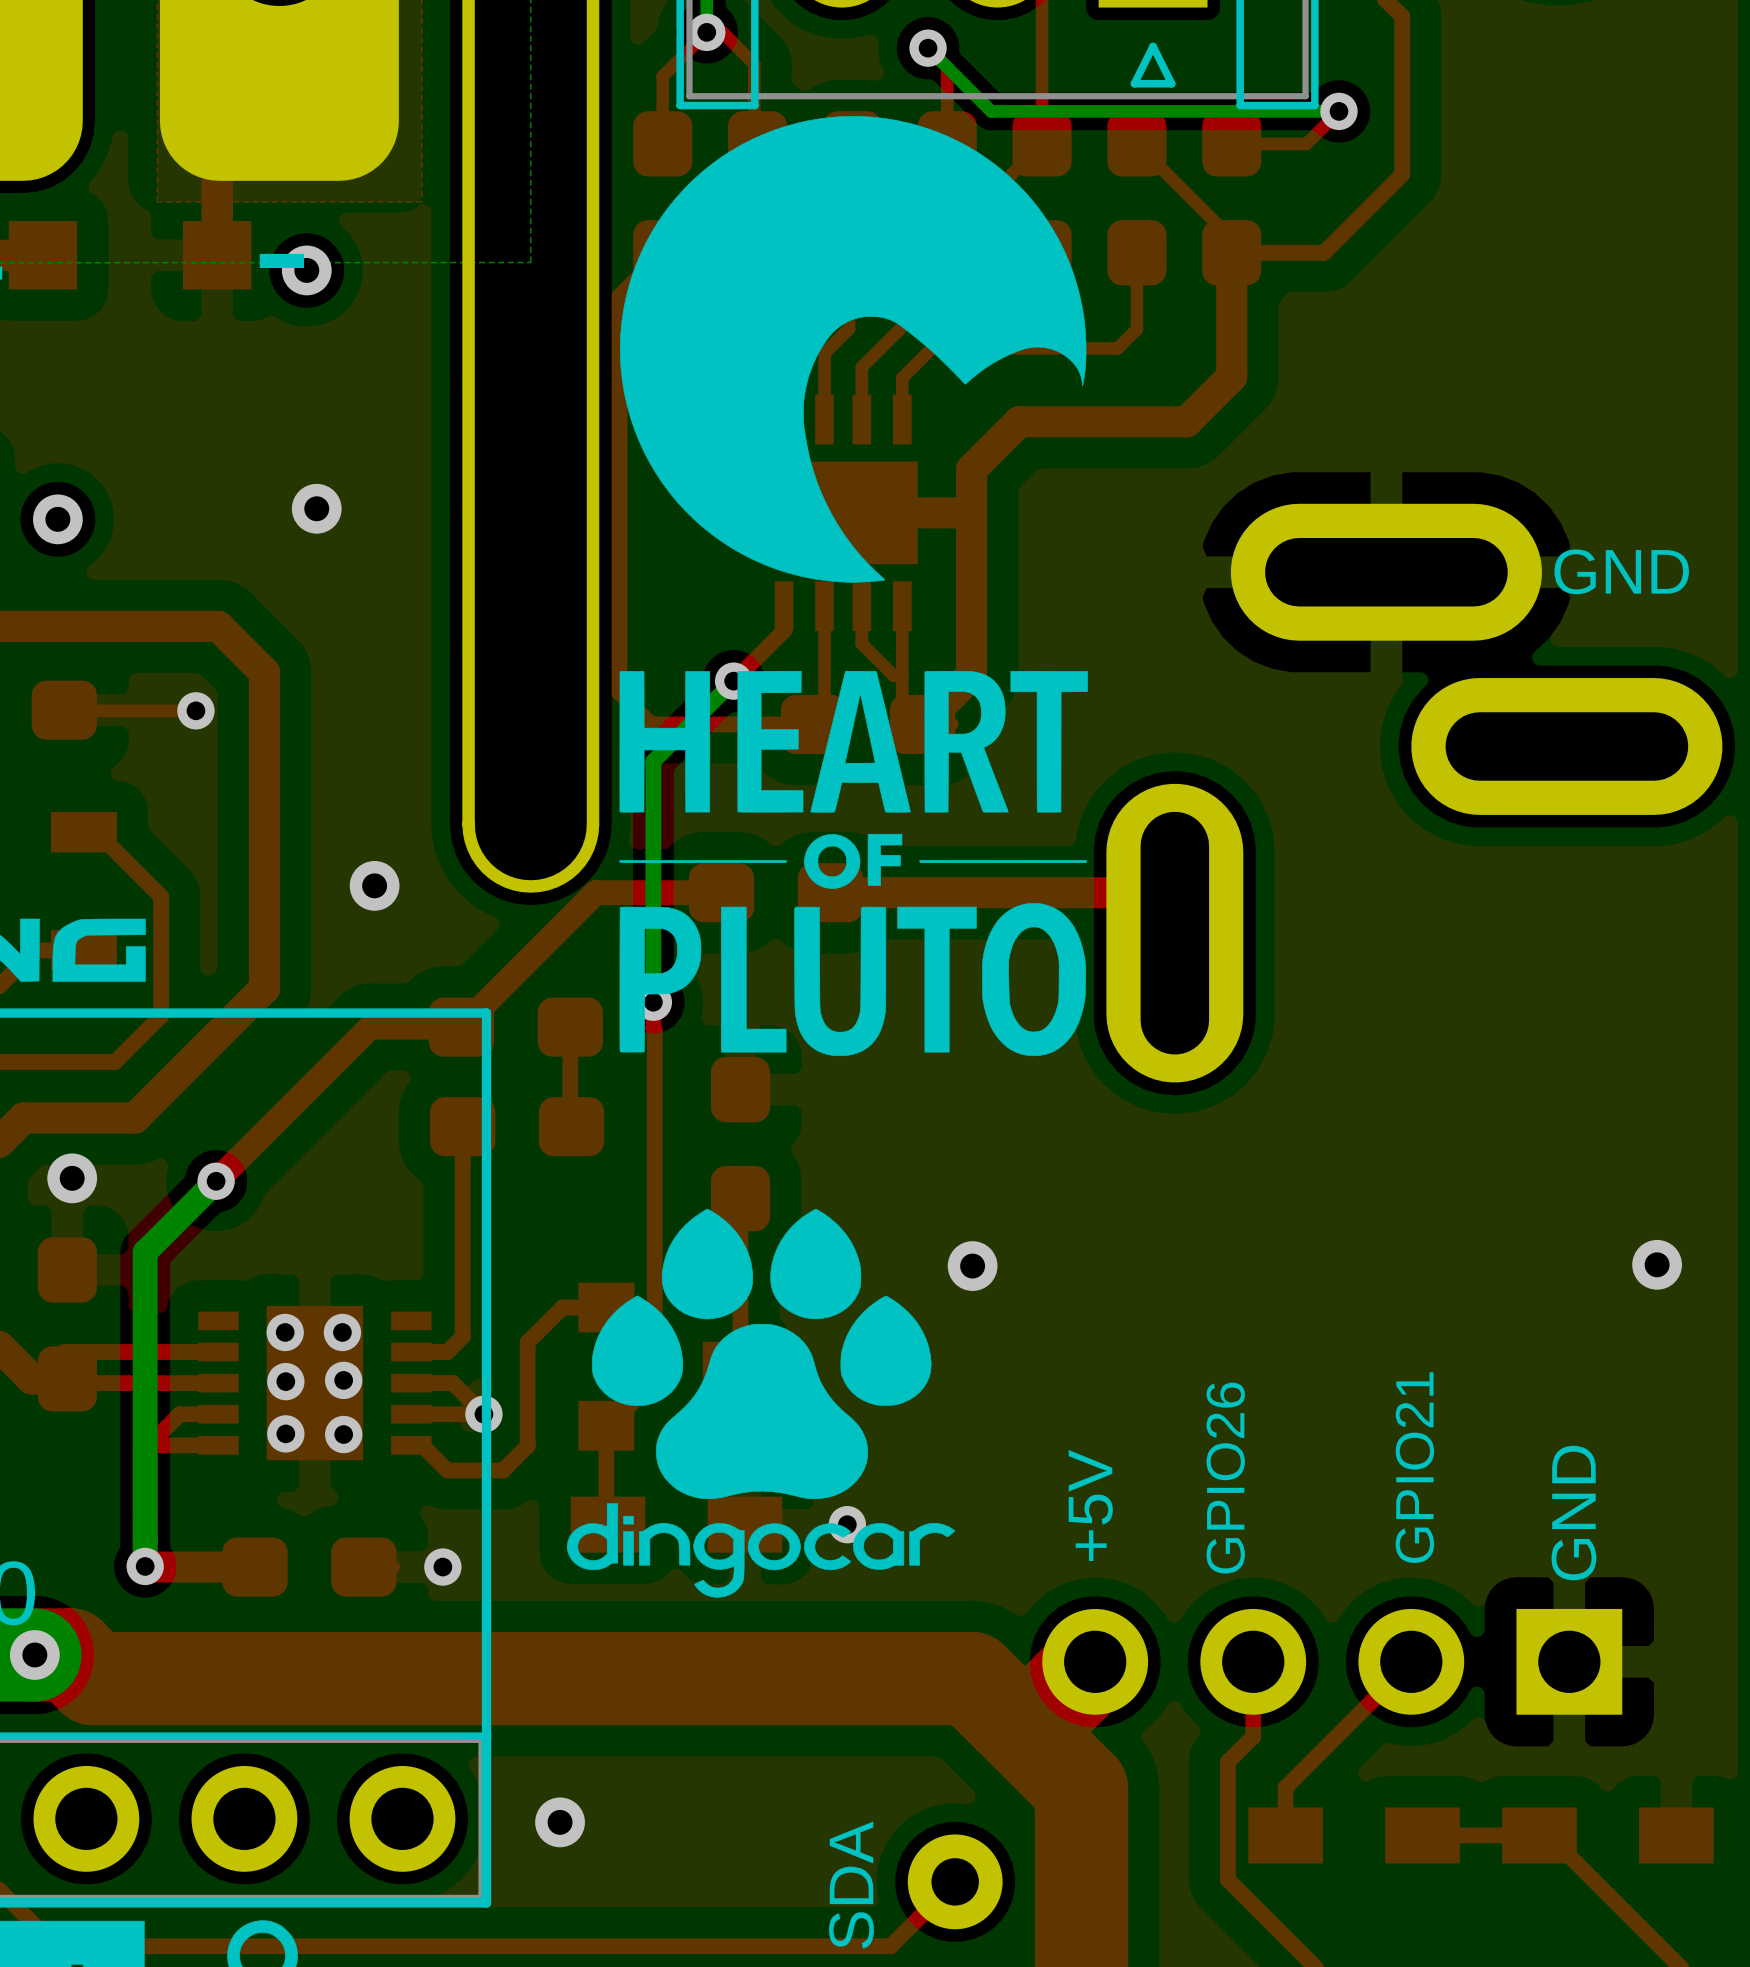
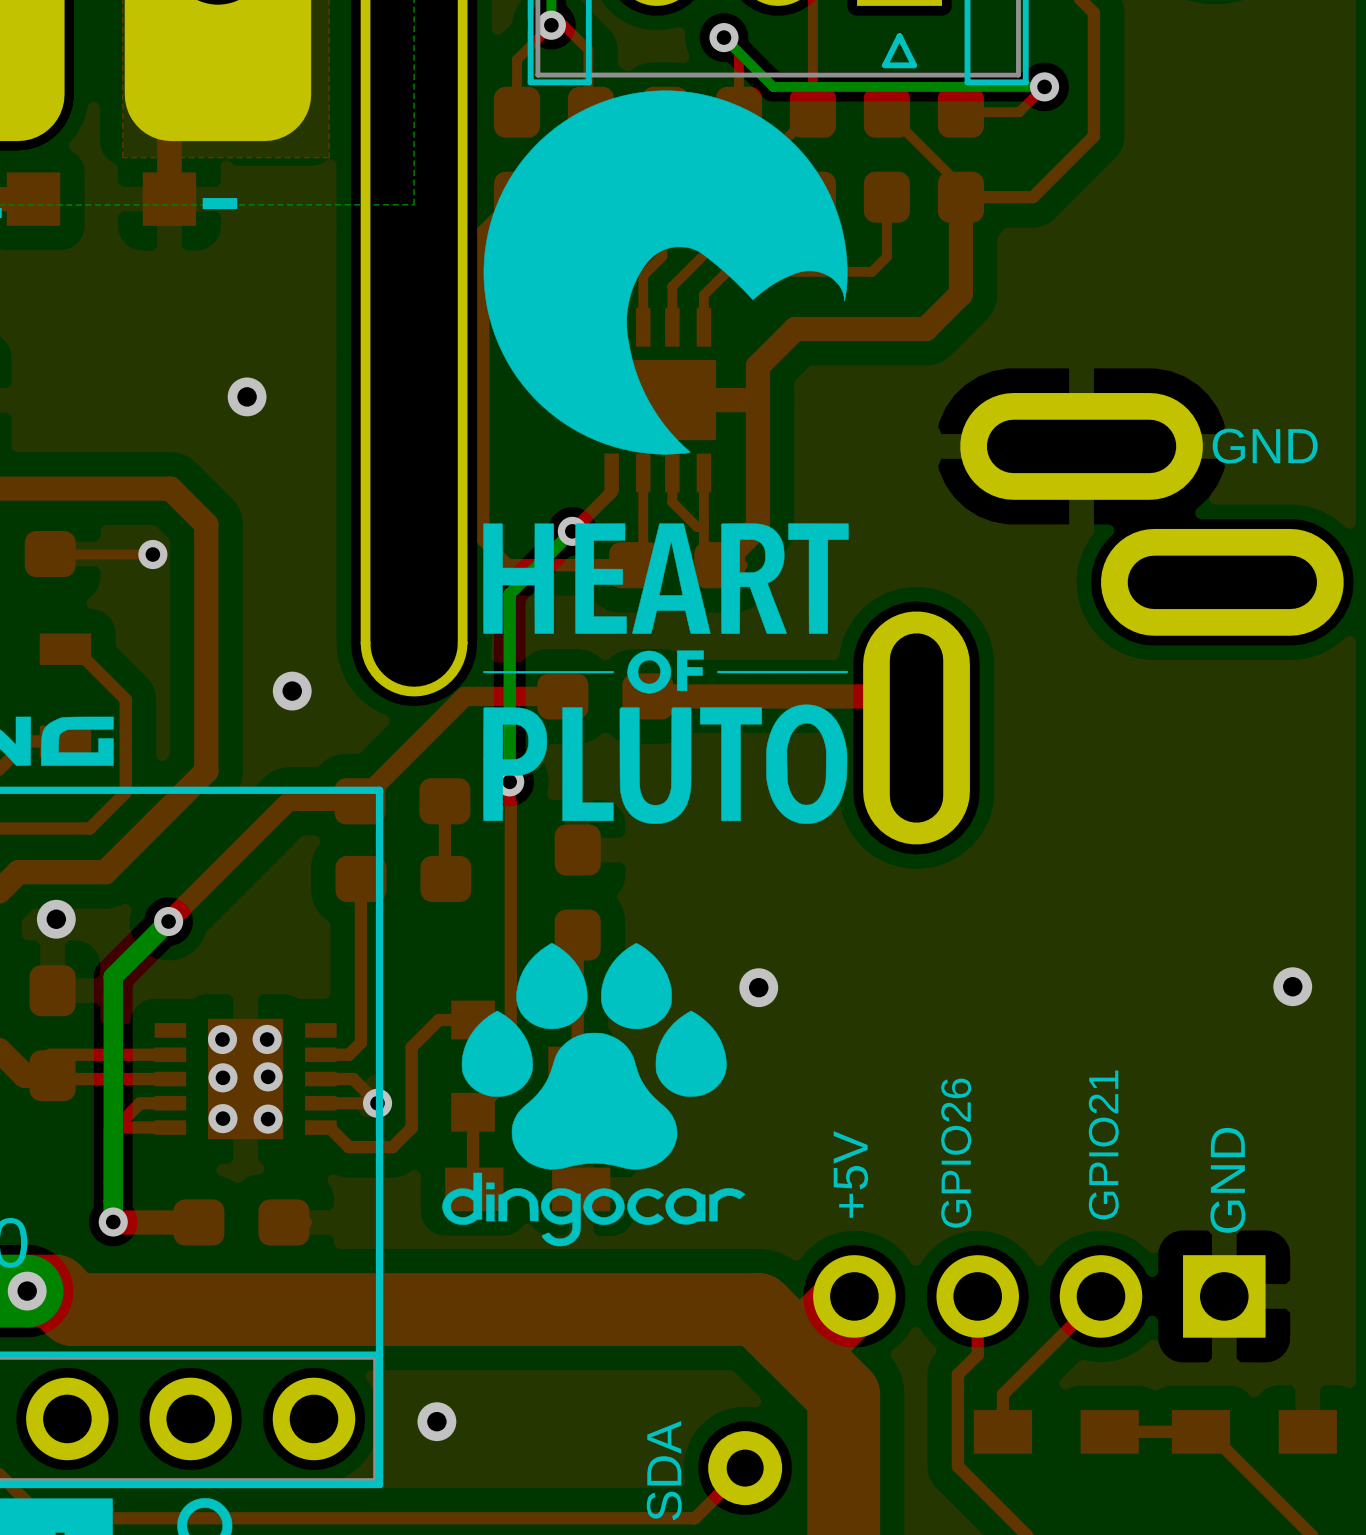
via: (306, 270) -> none
via: (57, 519) -> none
via: (847, 1524) -> none
via: (442, 1567) -> none

